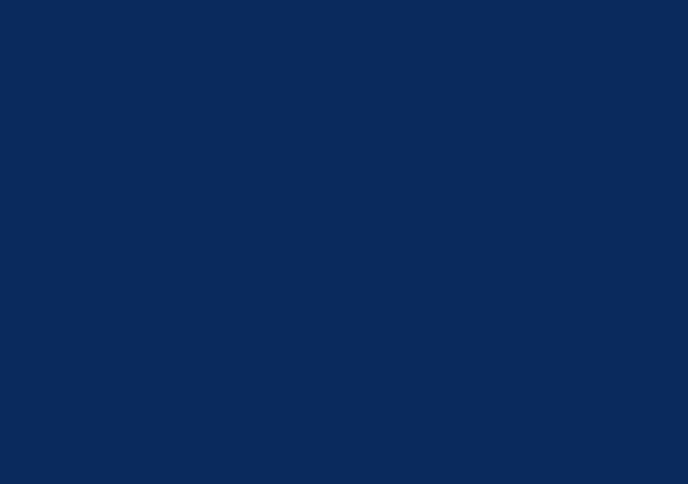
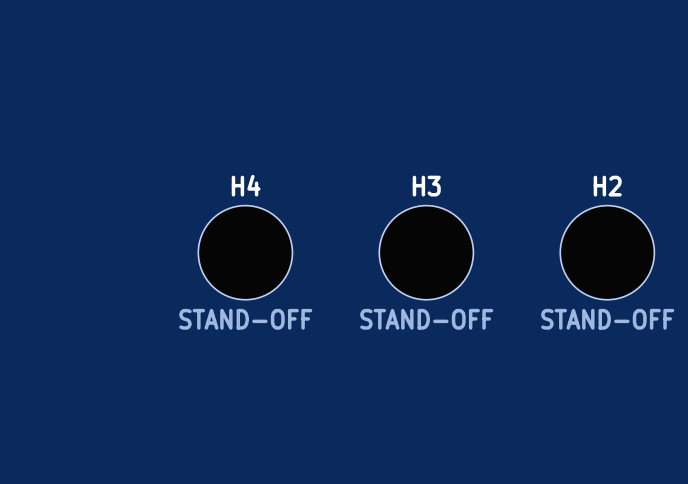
H4: none -> STAND-OFF (245, 252)
H3: none -> STAND-OFF (426, 252)
H2: none -> STAND-OFF (607, 252)

